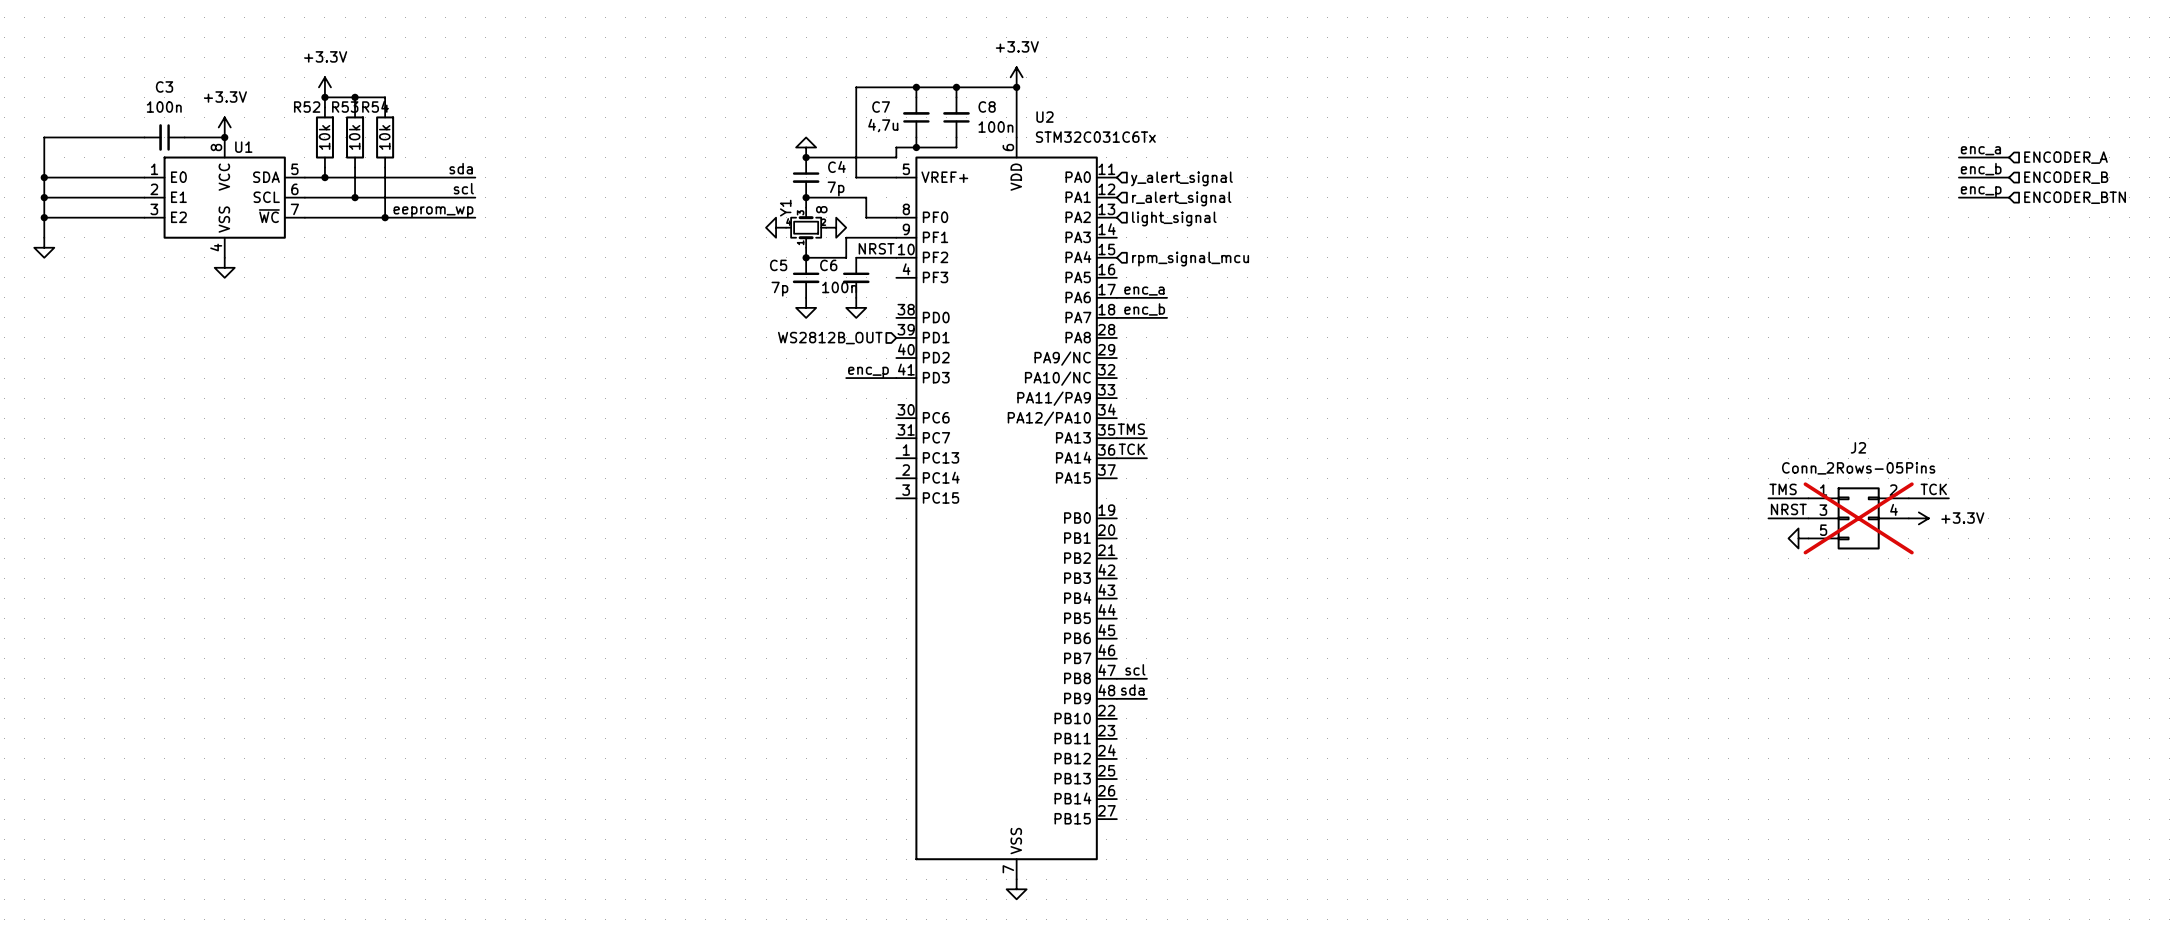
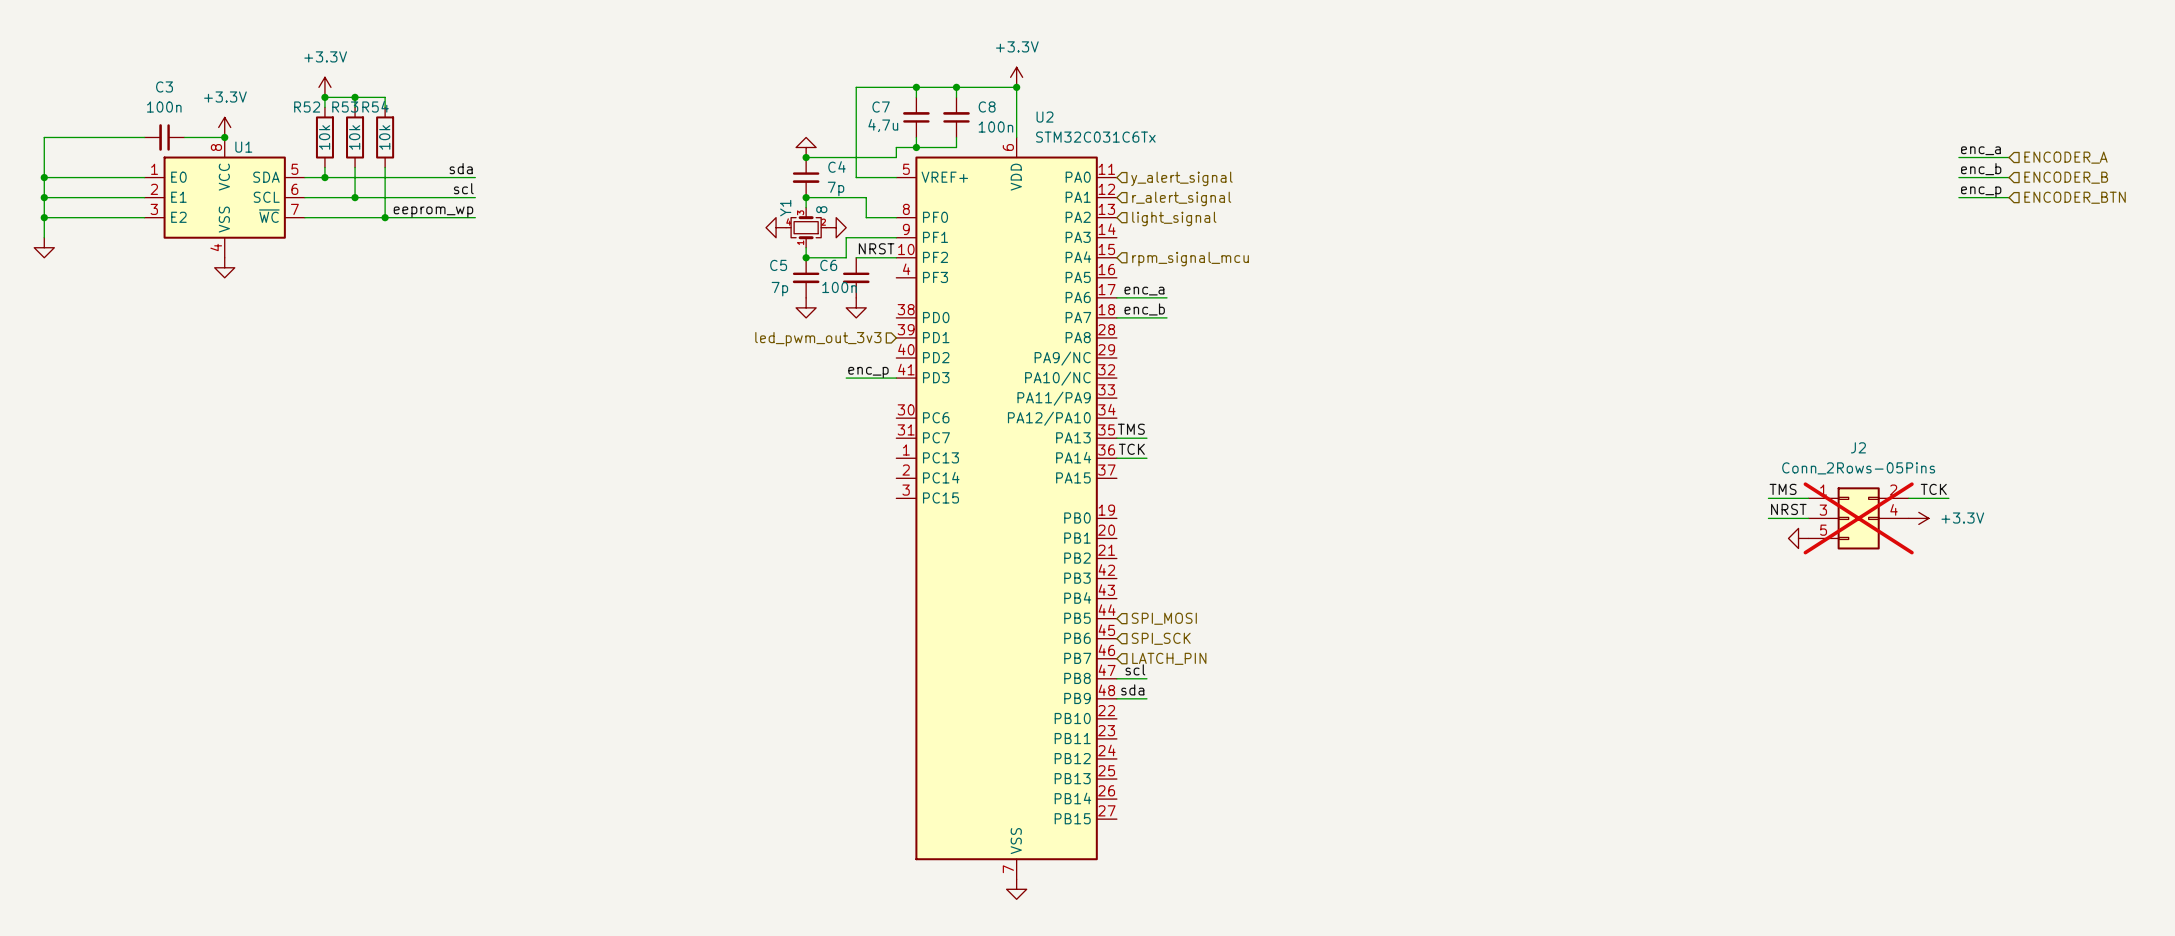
hierarchical label: WS2812B_OUT (830, 338) -> led_pwm_out_3v3 (818, 339)
hierarchical label: none -> SPI_MOSI (1164, 618)
hierarchical label: none -> SPI_SCK (1161, 638)
hierarchical label: none -> LATCH_PIN (1169, 658)

